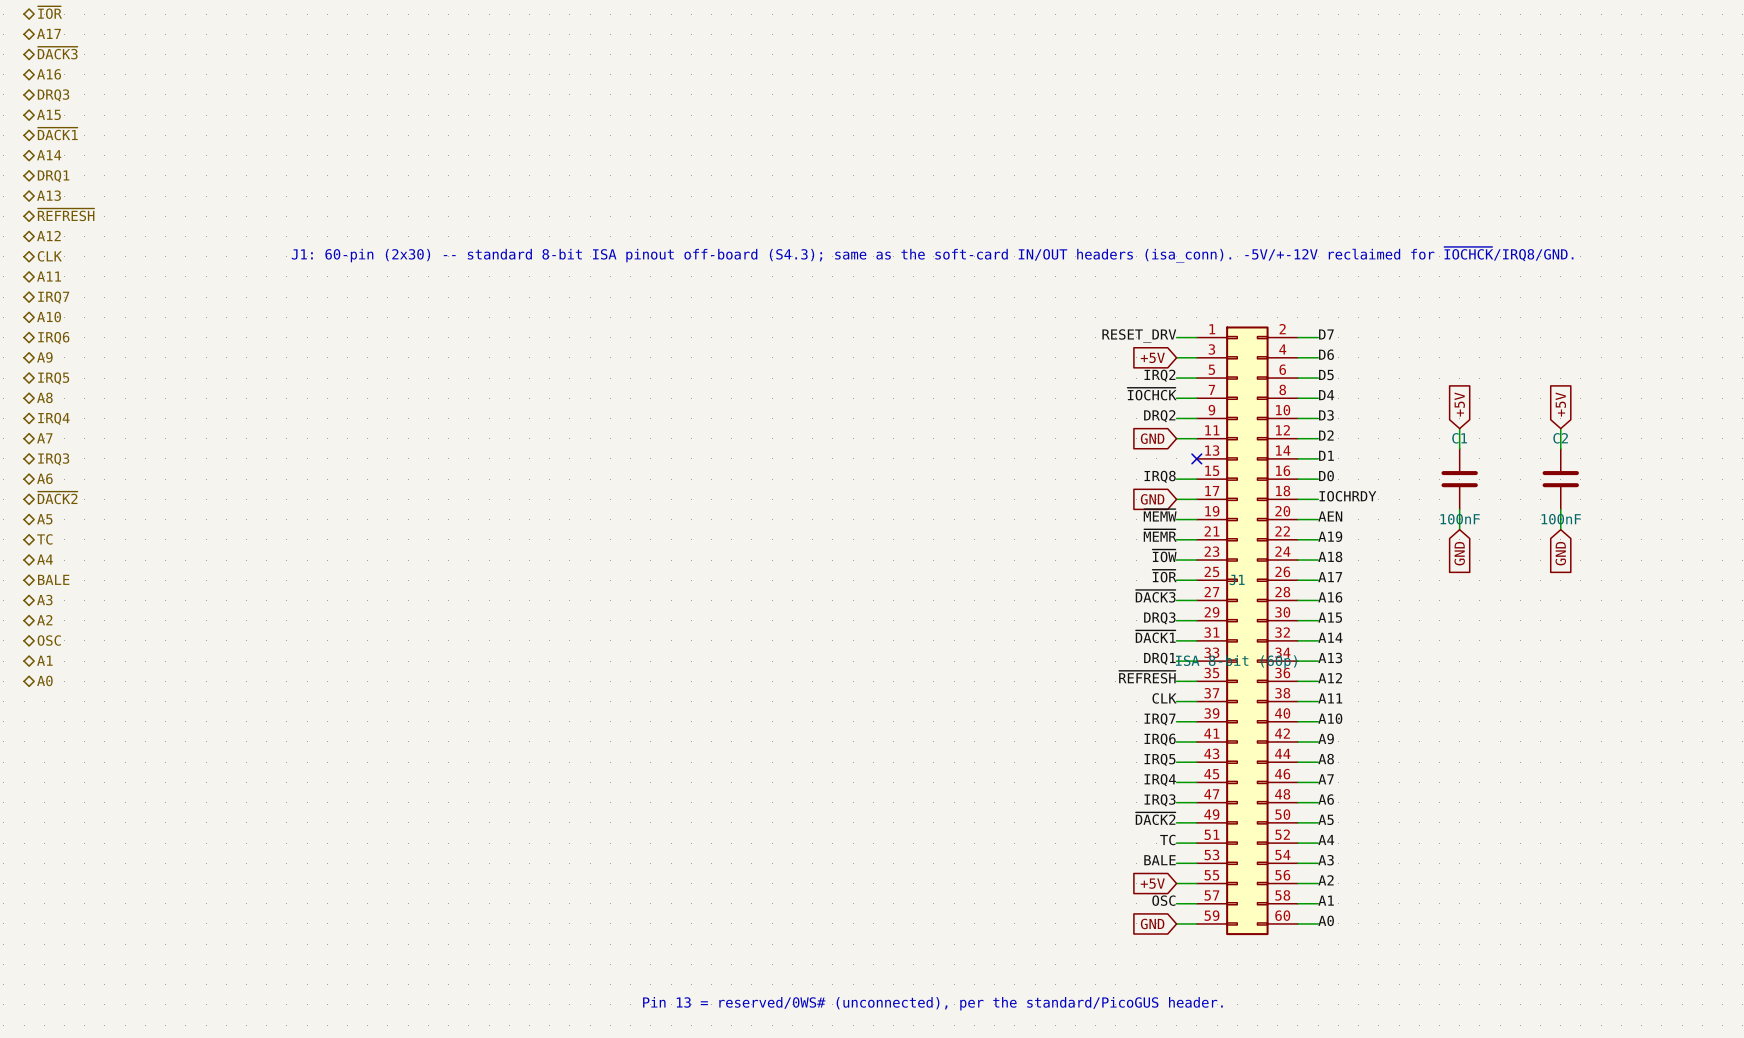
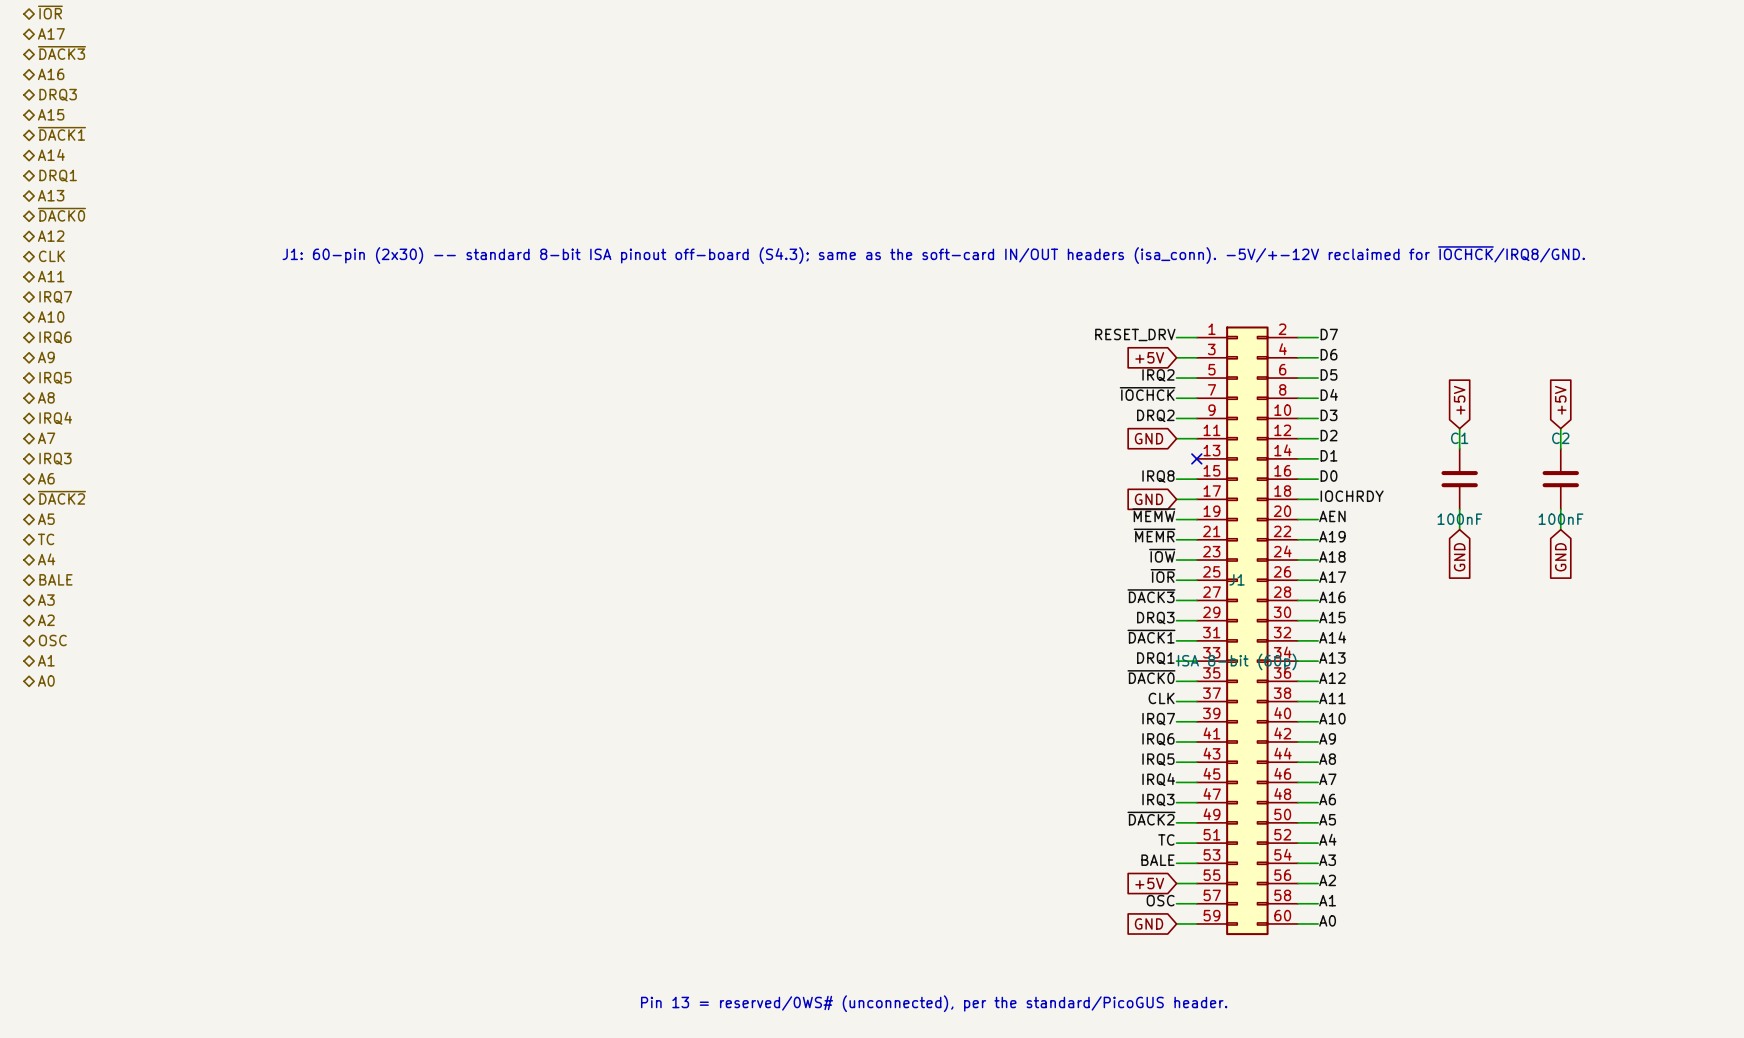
hierarchical label: ~{REFRESH} (66, 214) -> ~{DACK0} (61, 214)
label: ~{REFRESH} (1147, 677) -> ~{DACK0} (1151, 677)

